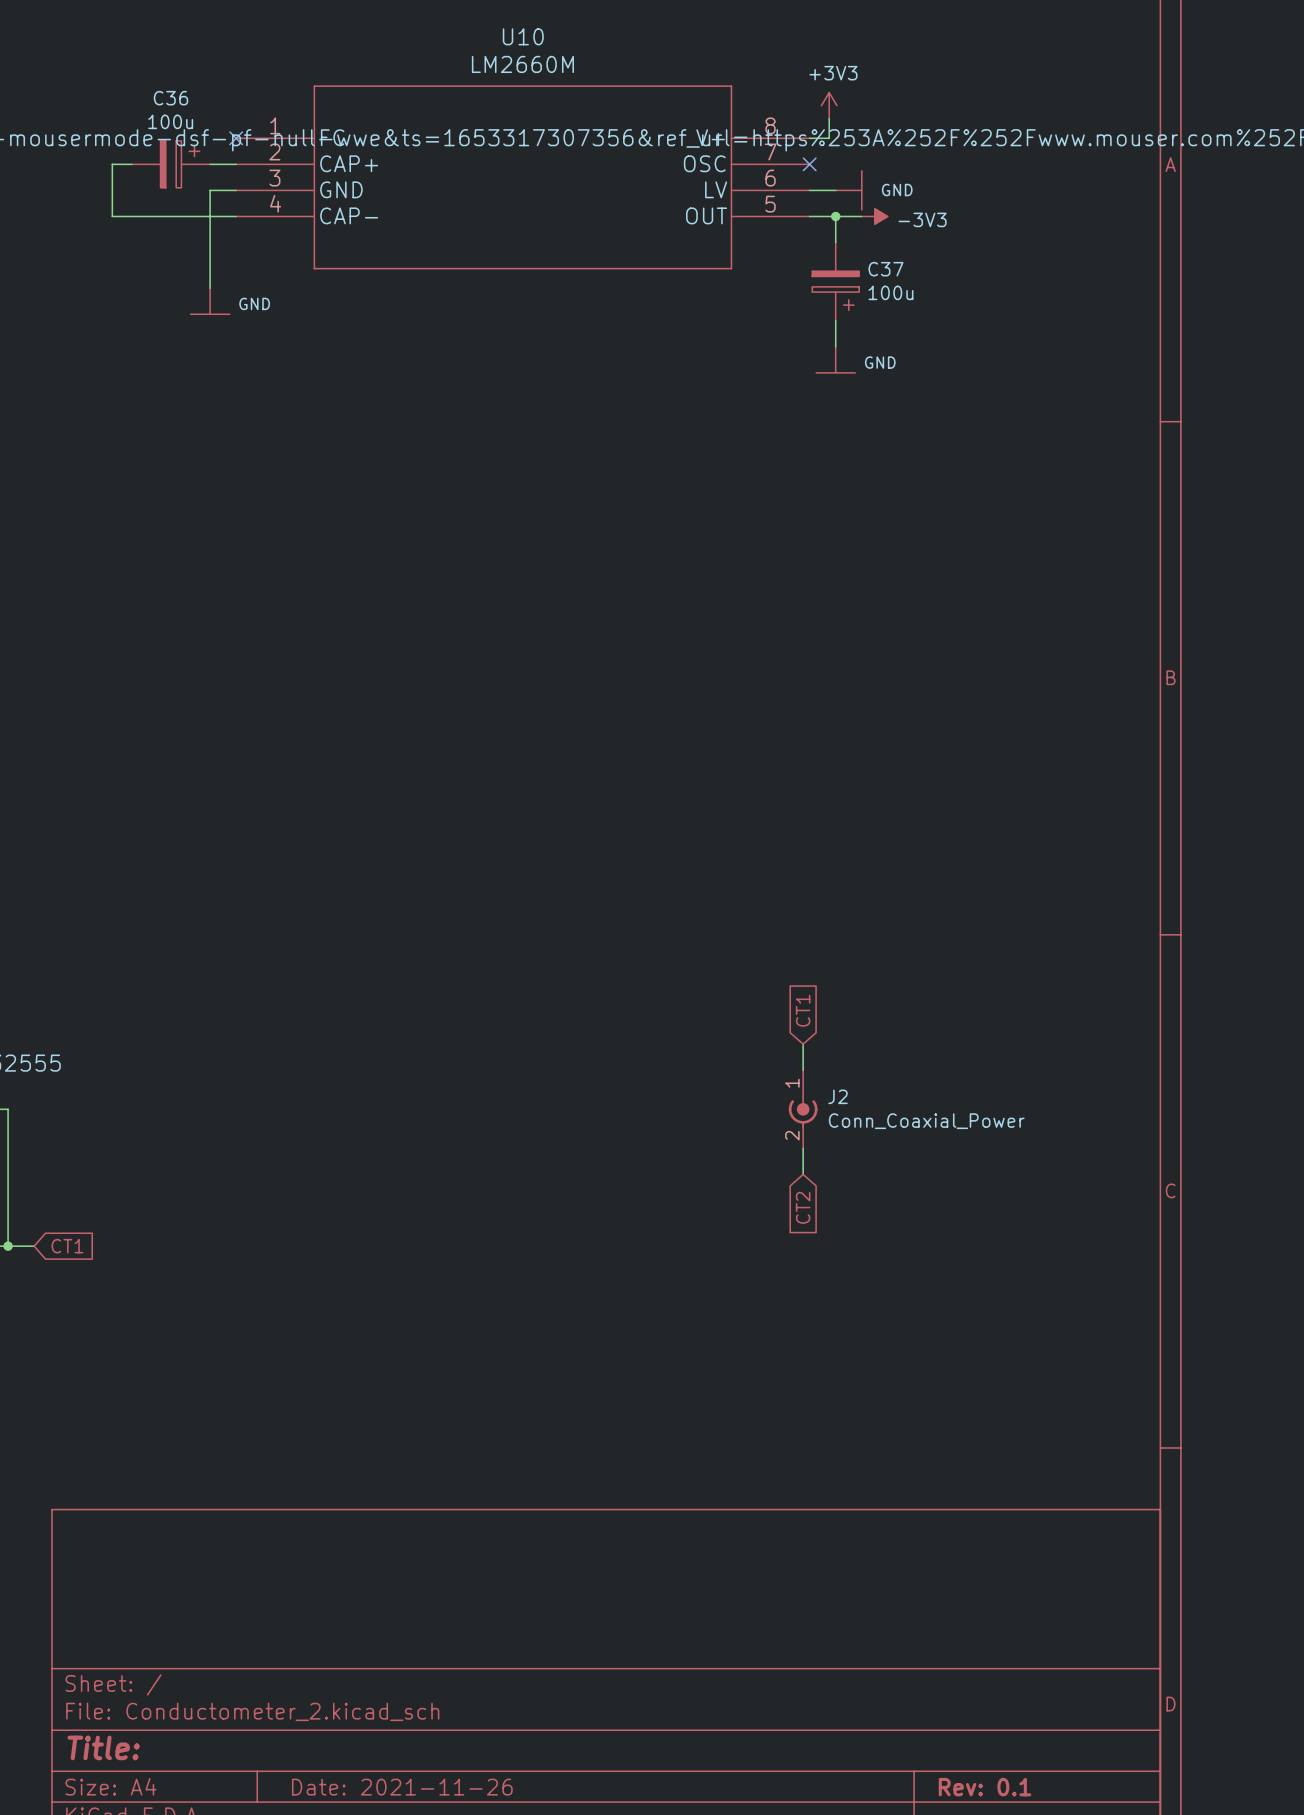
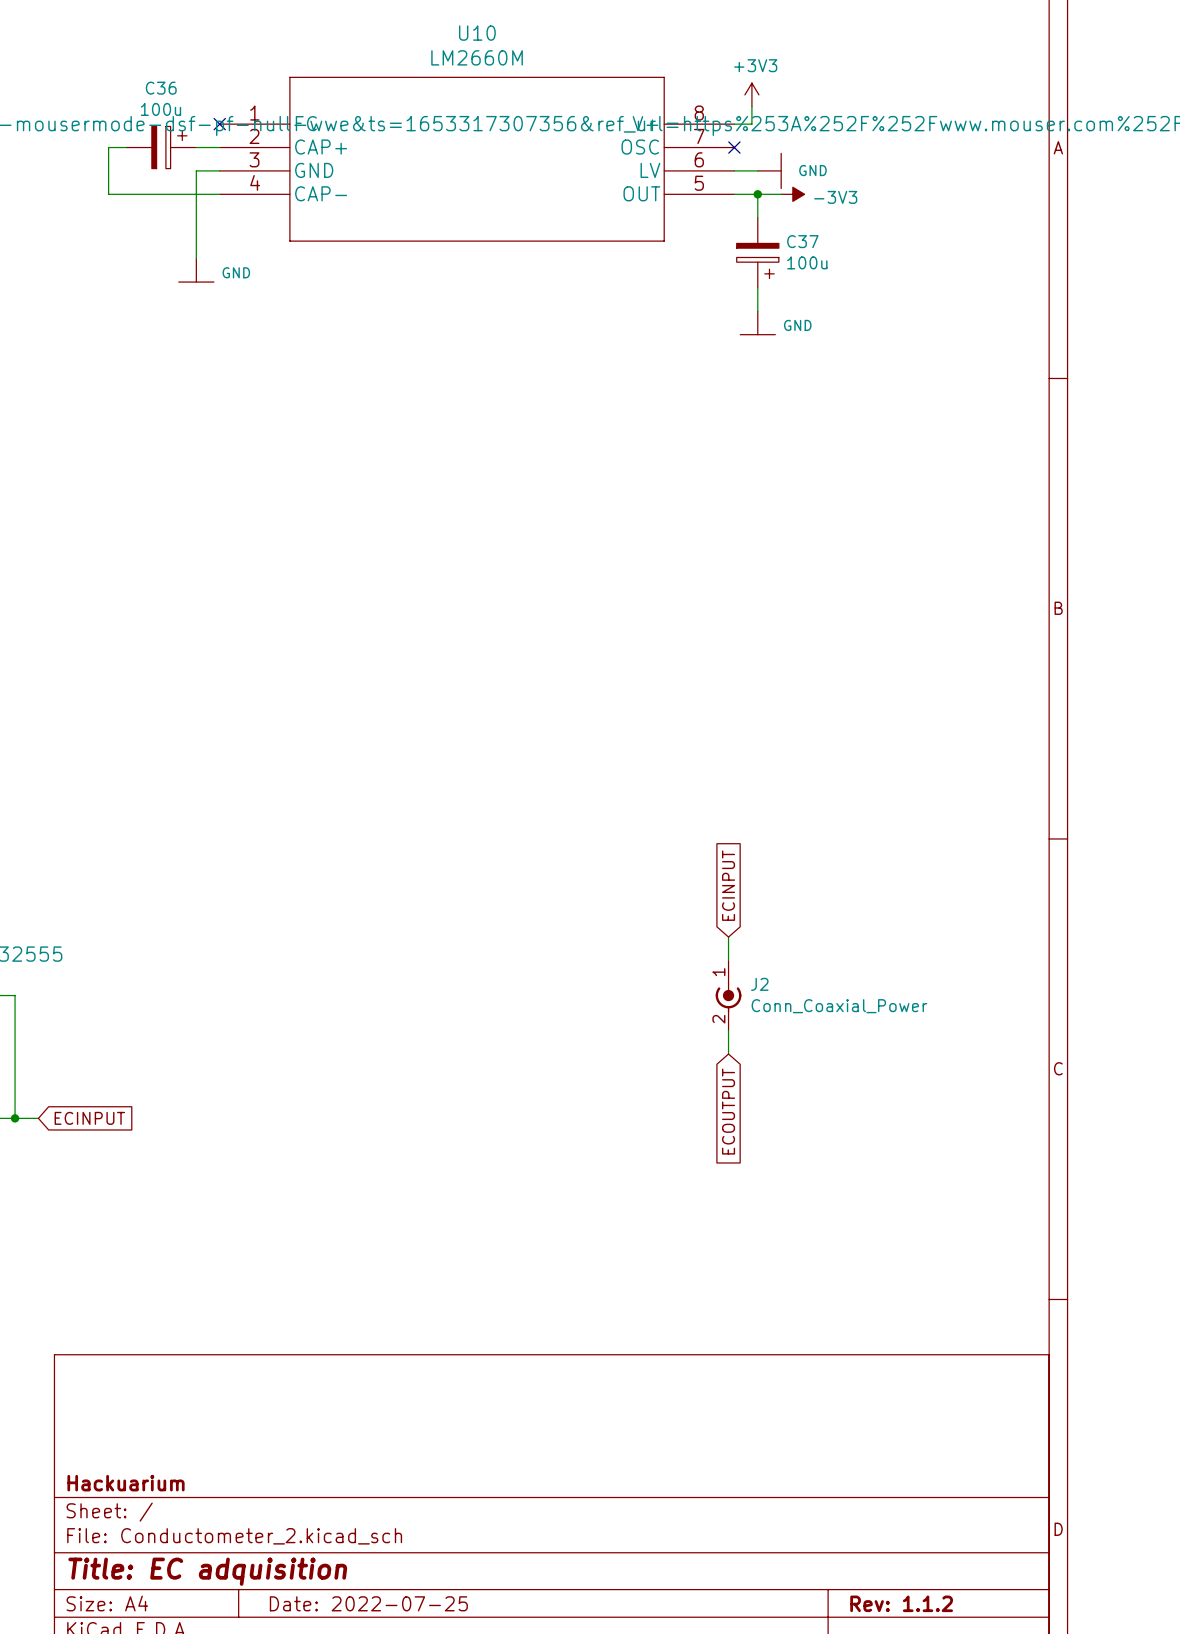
global label: CT1 (803, 1010) -> ECINPUT (728, 885)
global label: CT2 (803, 1207) -> ECOUTPUT (728, 1111)
global label: CT1 (67, 1246) -> ECINPUT (89, 1118)
title block: none -> Hackuarium (126, 1483)
title block: Title: (103, 1747) -> Title: EC adquisition (207, 1571)
title block: Date: 2021-11-26 (402, 1787) -> Date: 2022-07-25 (368, 1603)
title block: Rev: 0.1 (985, 1787) -> Rev: 1.1.2 (901, 1603)

